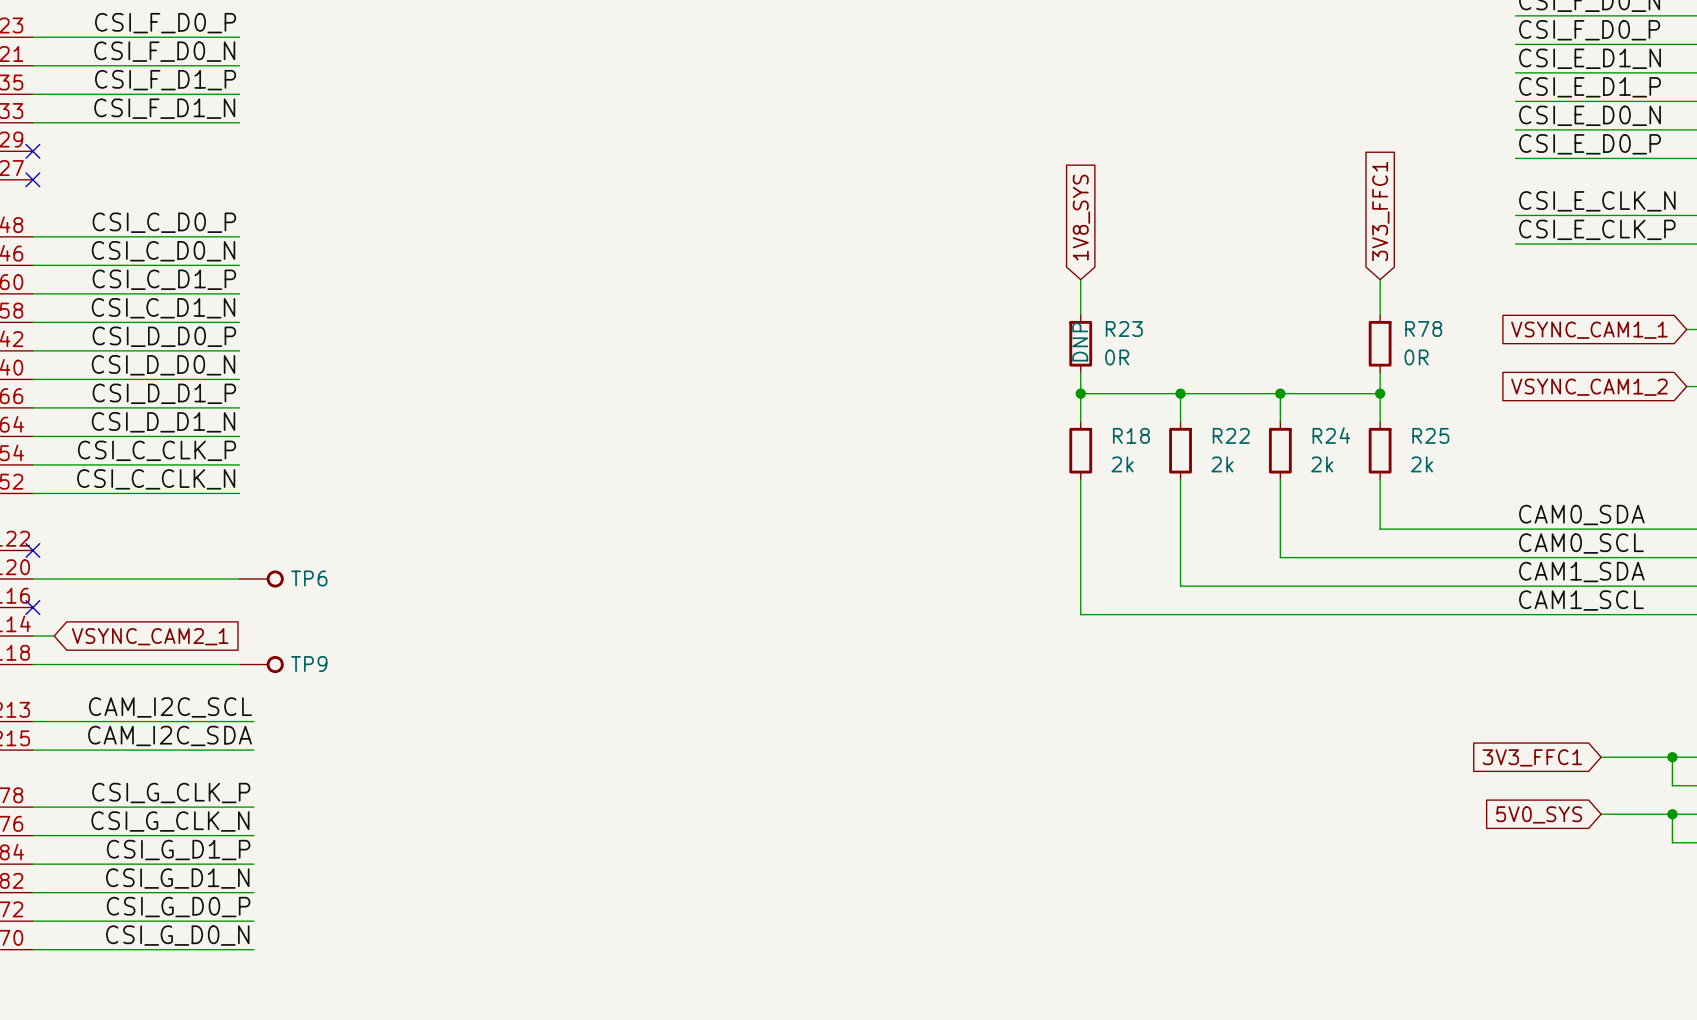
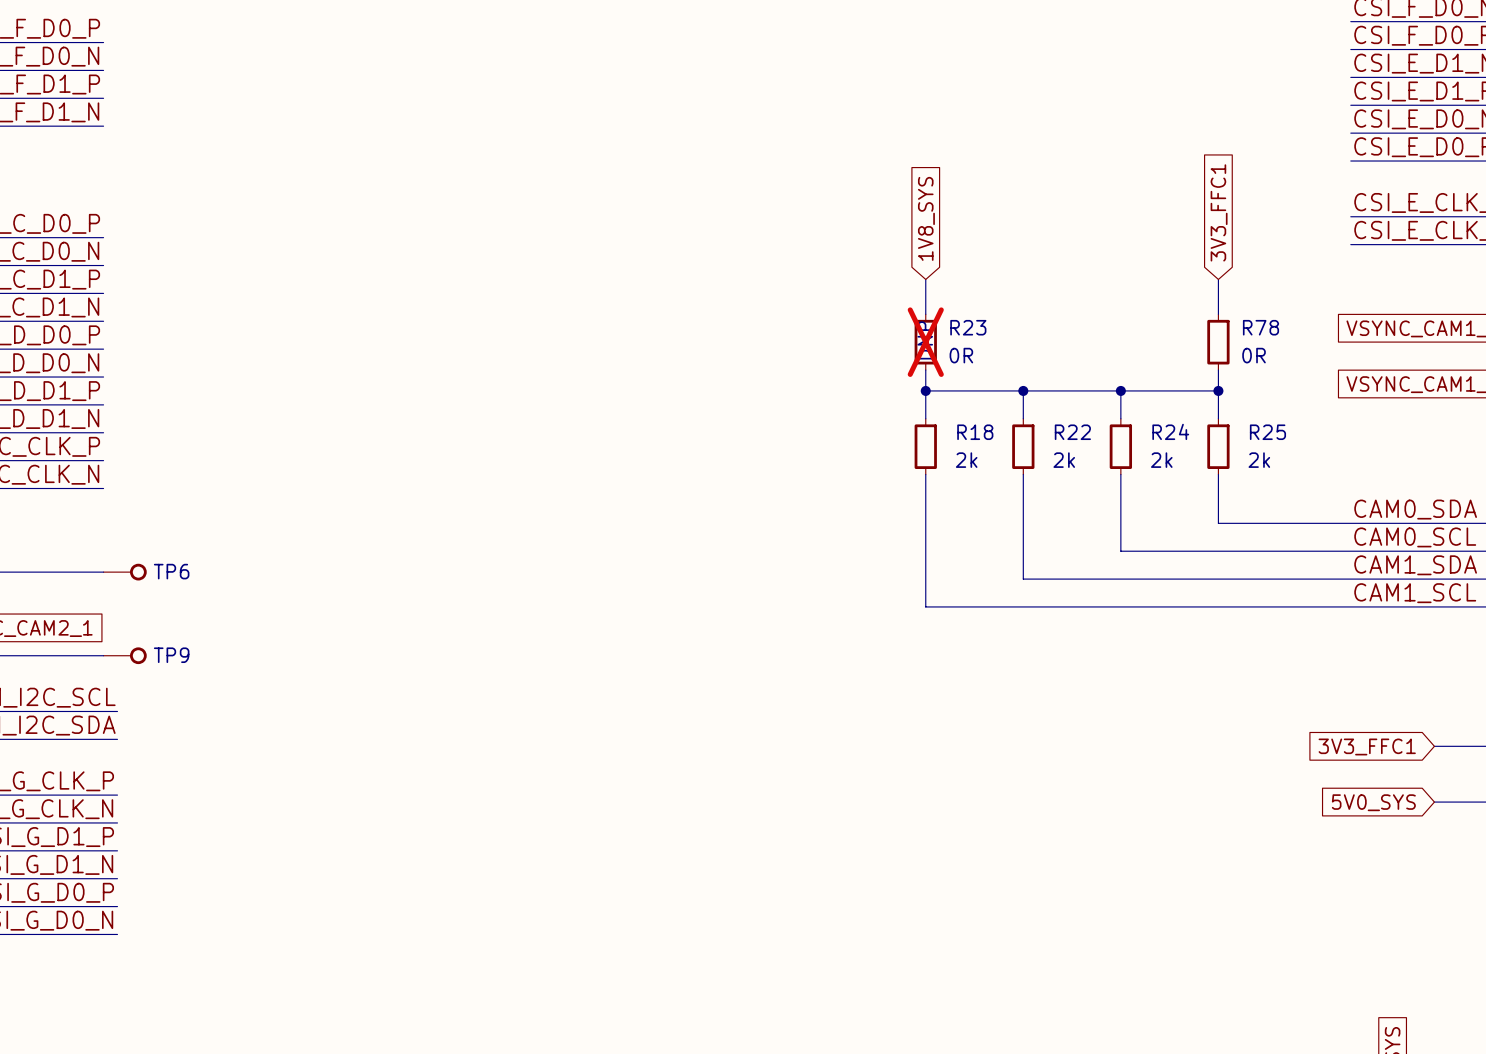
R23 do-not-place cross: none -> (925, 342)

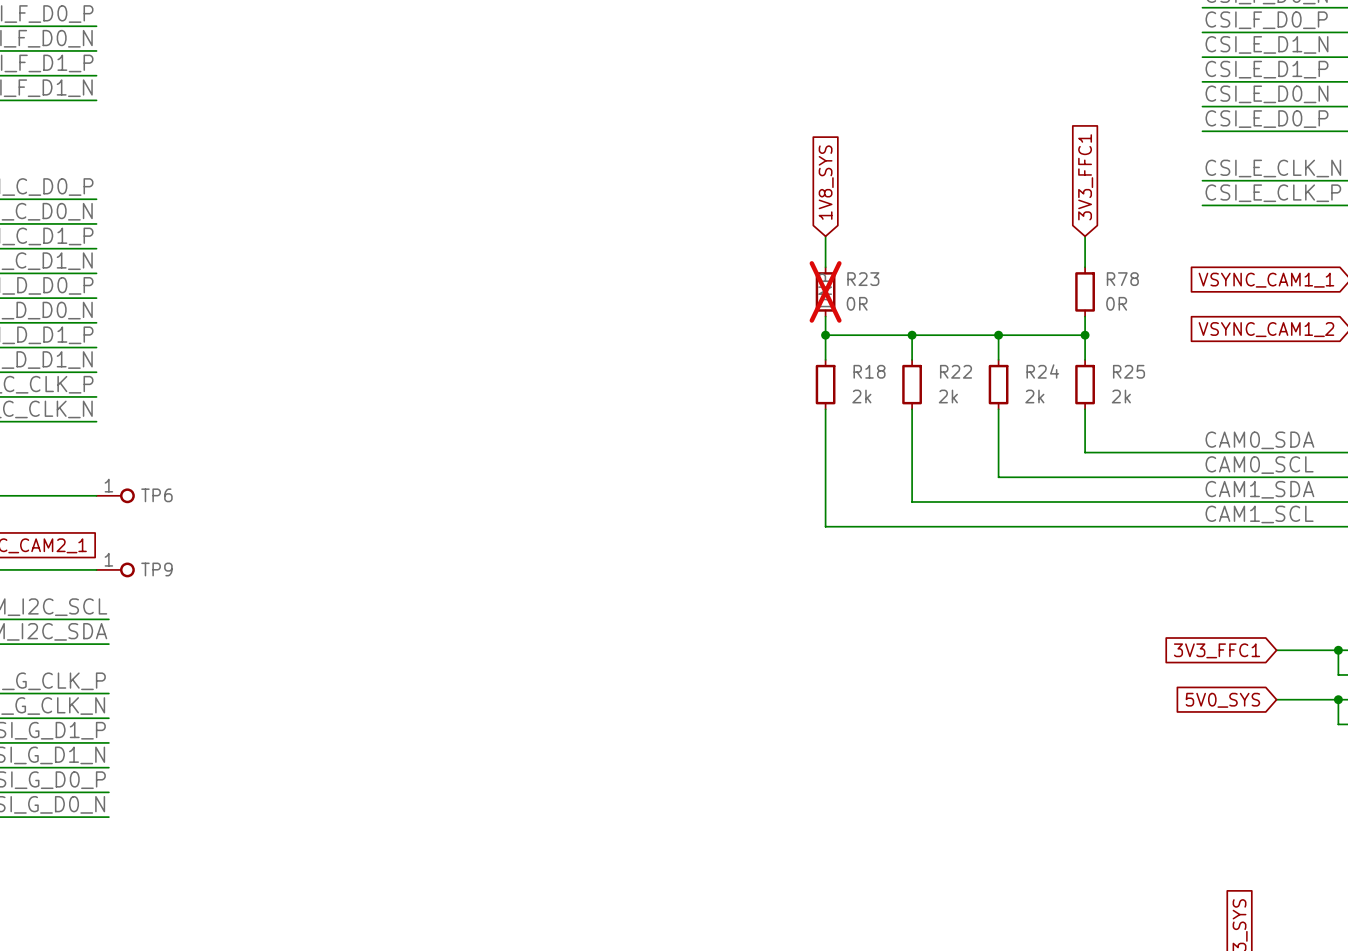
TP6 pin number: none -> 1 (108, 485)
TP9 pin number: none -> 1 (108, 559)

